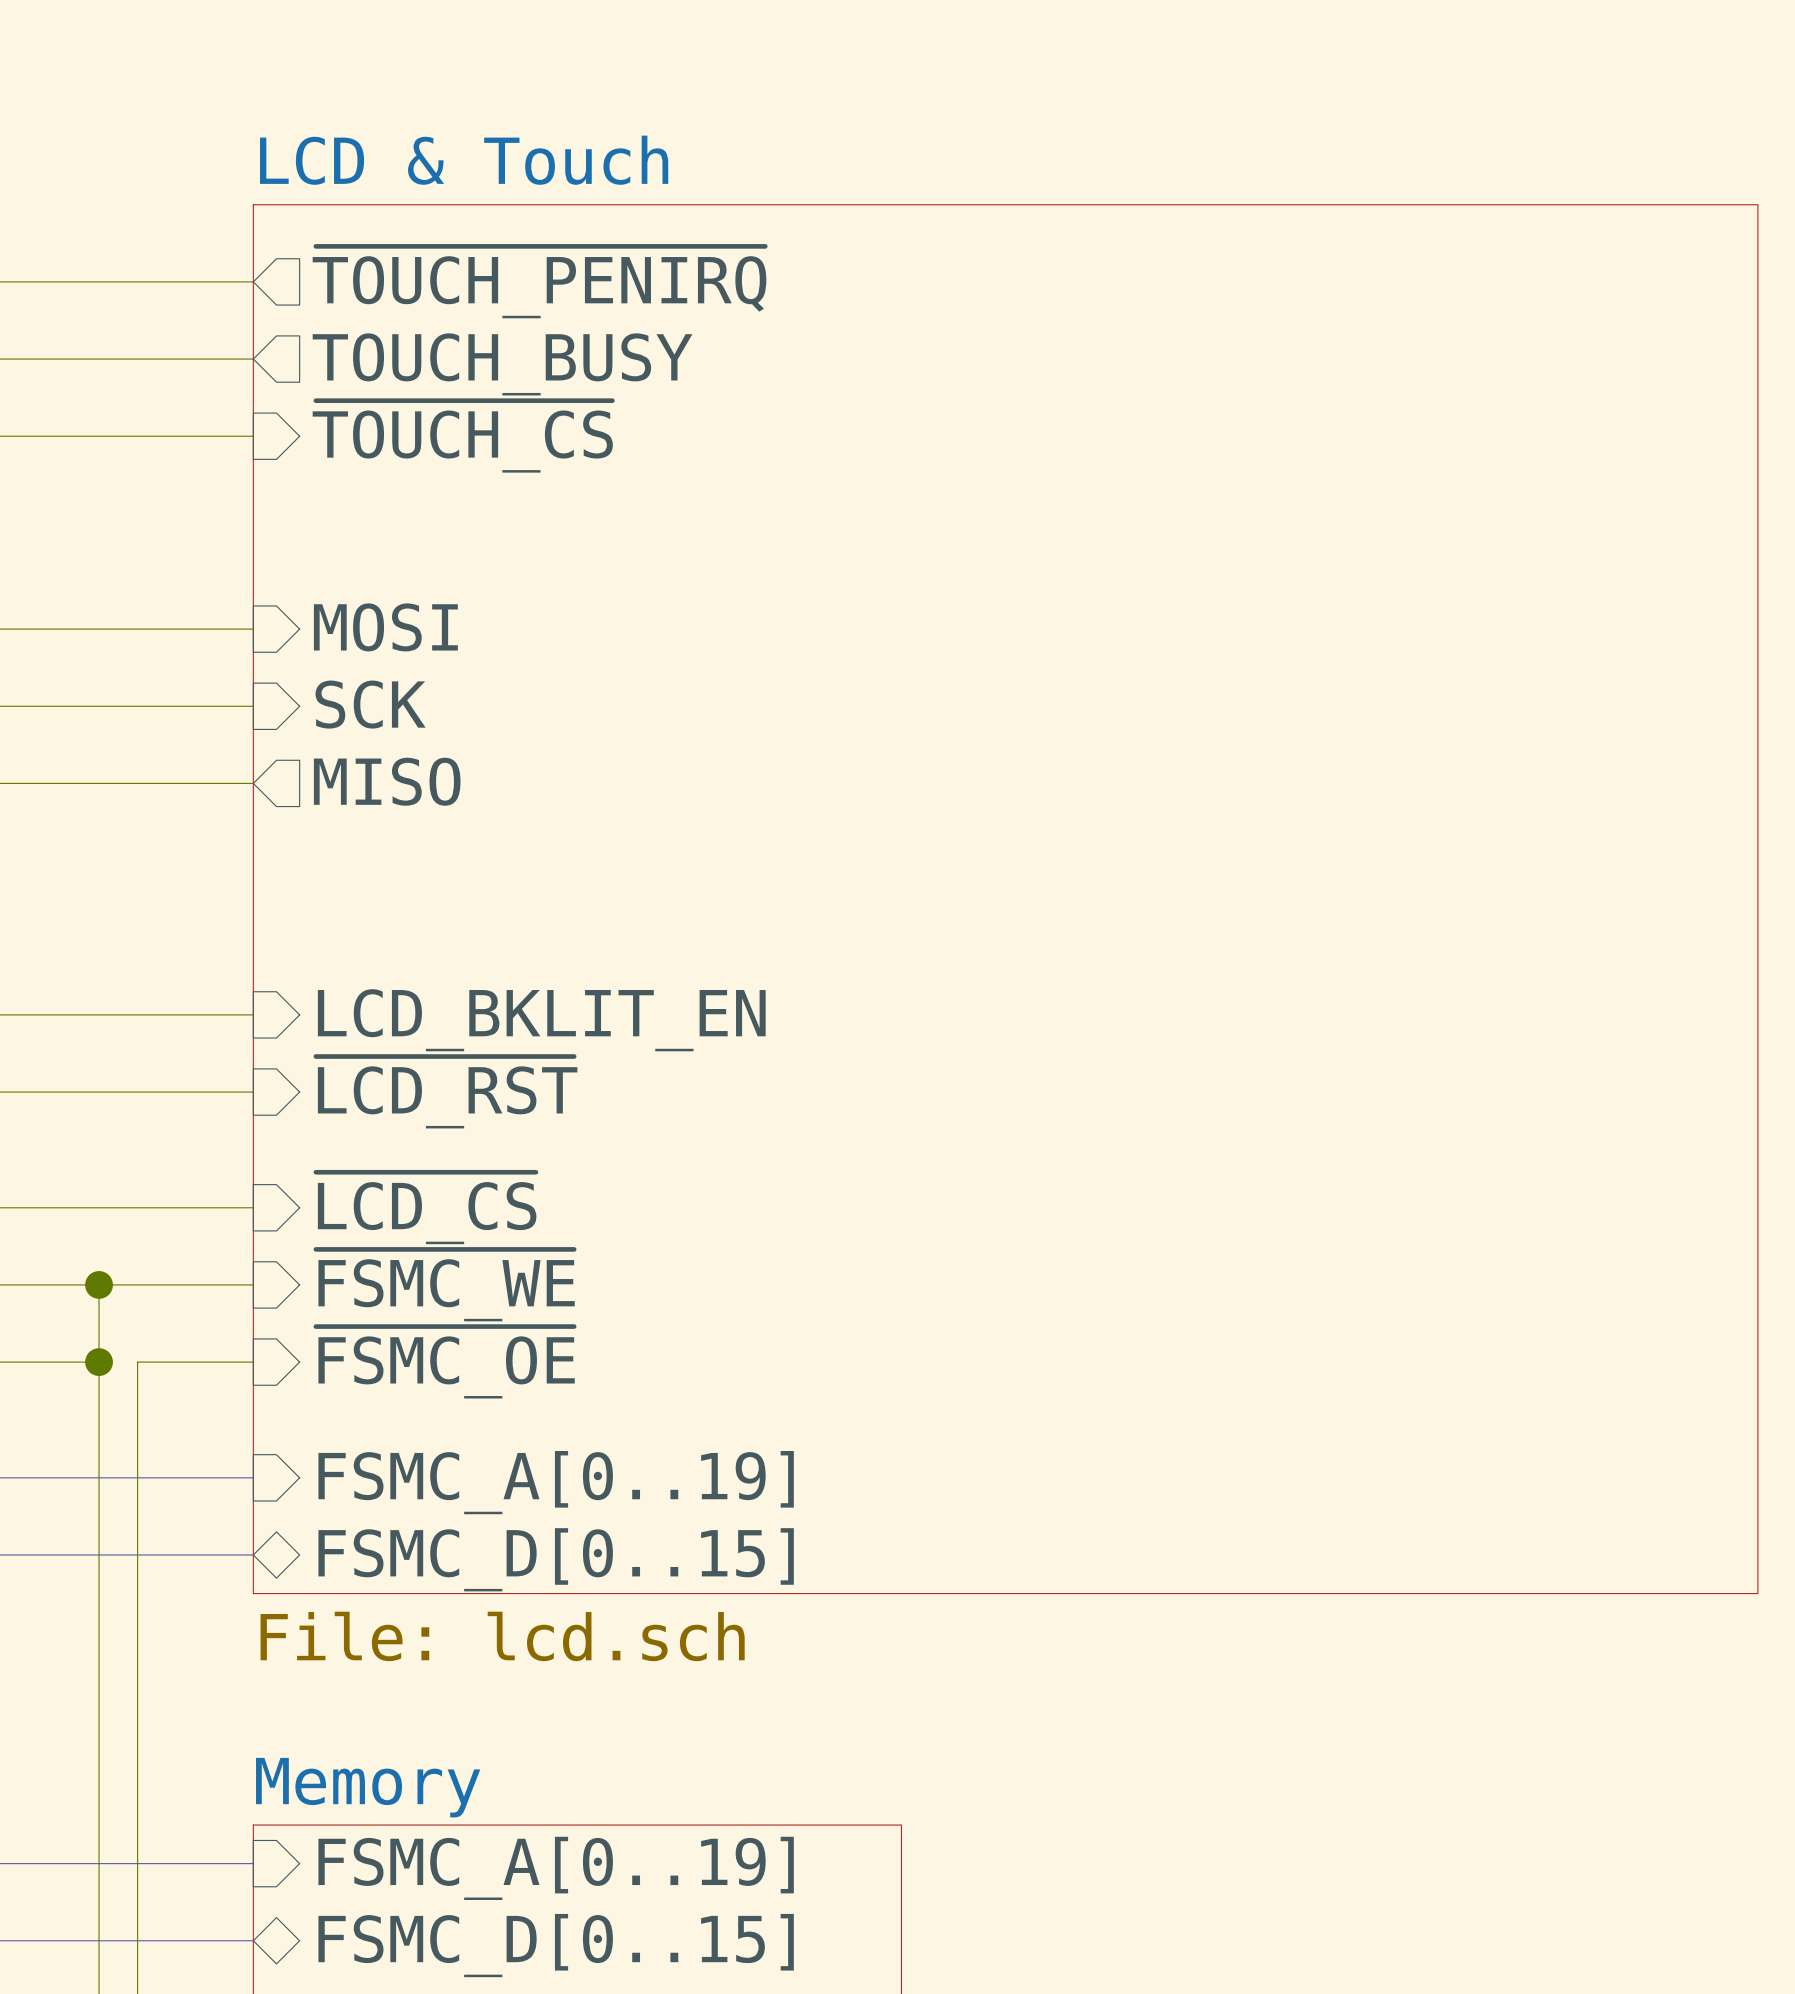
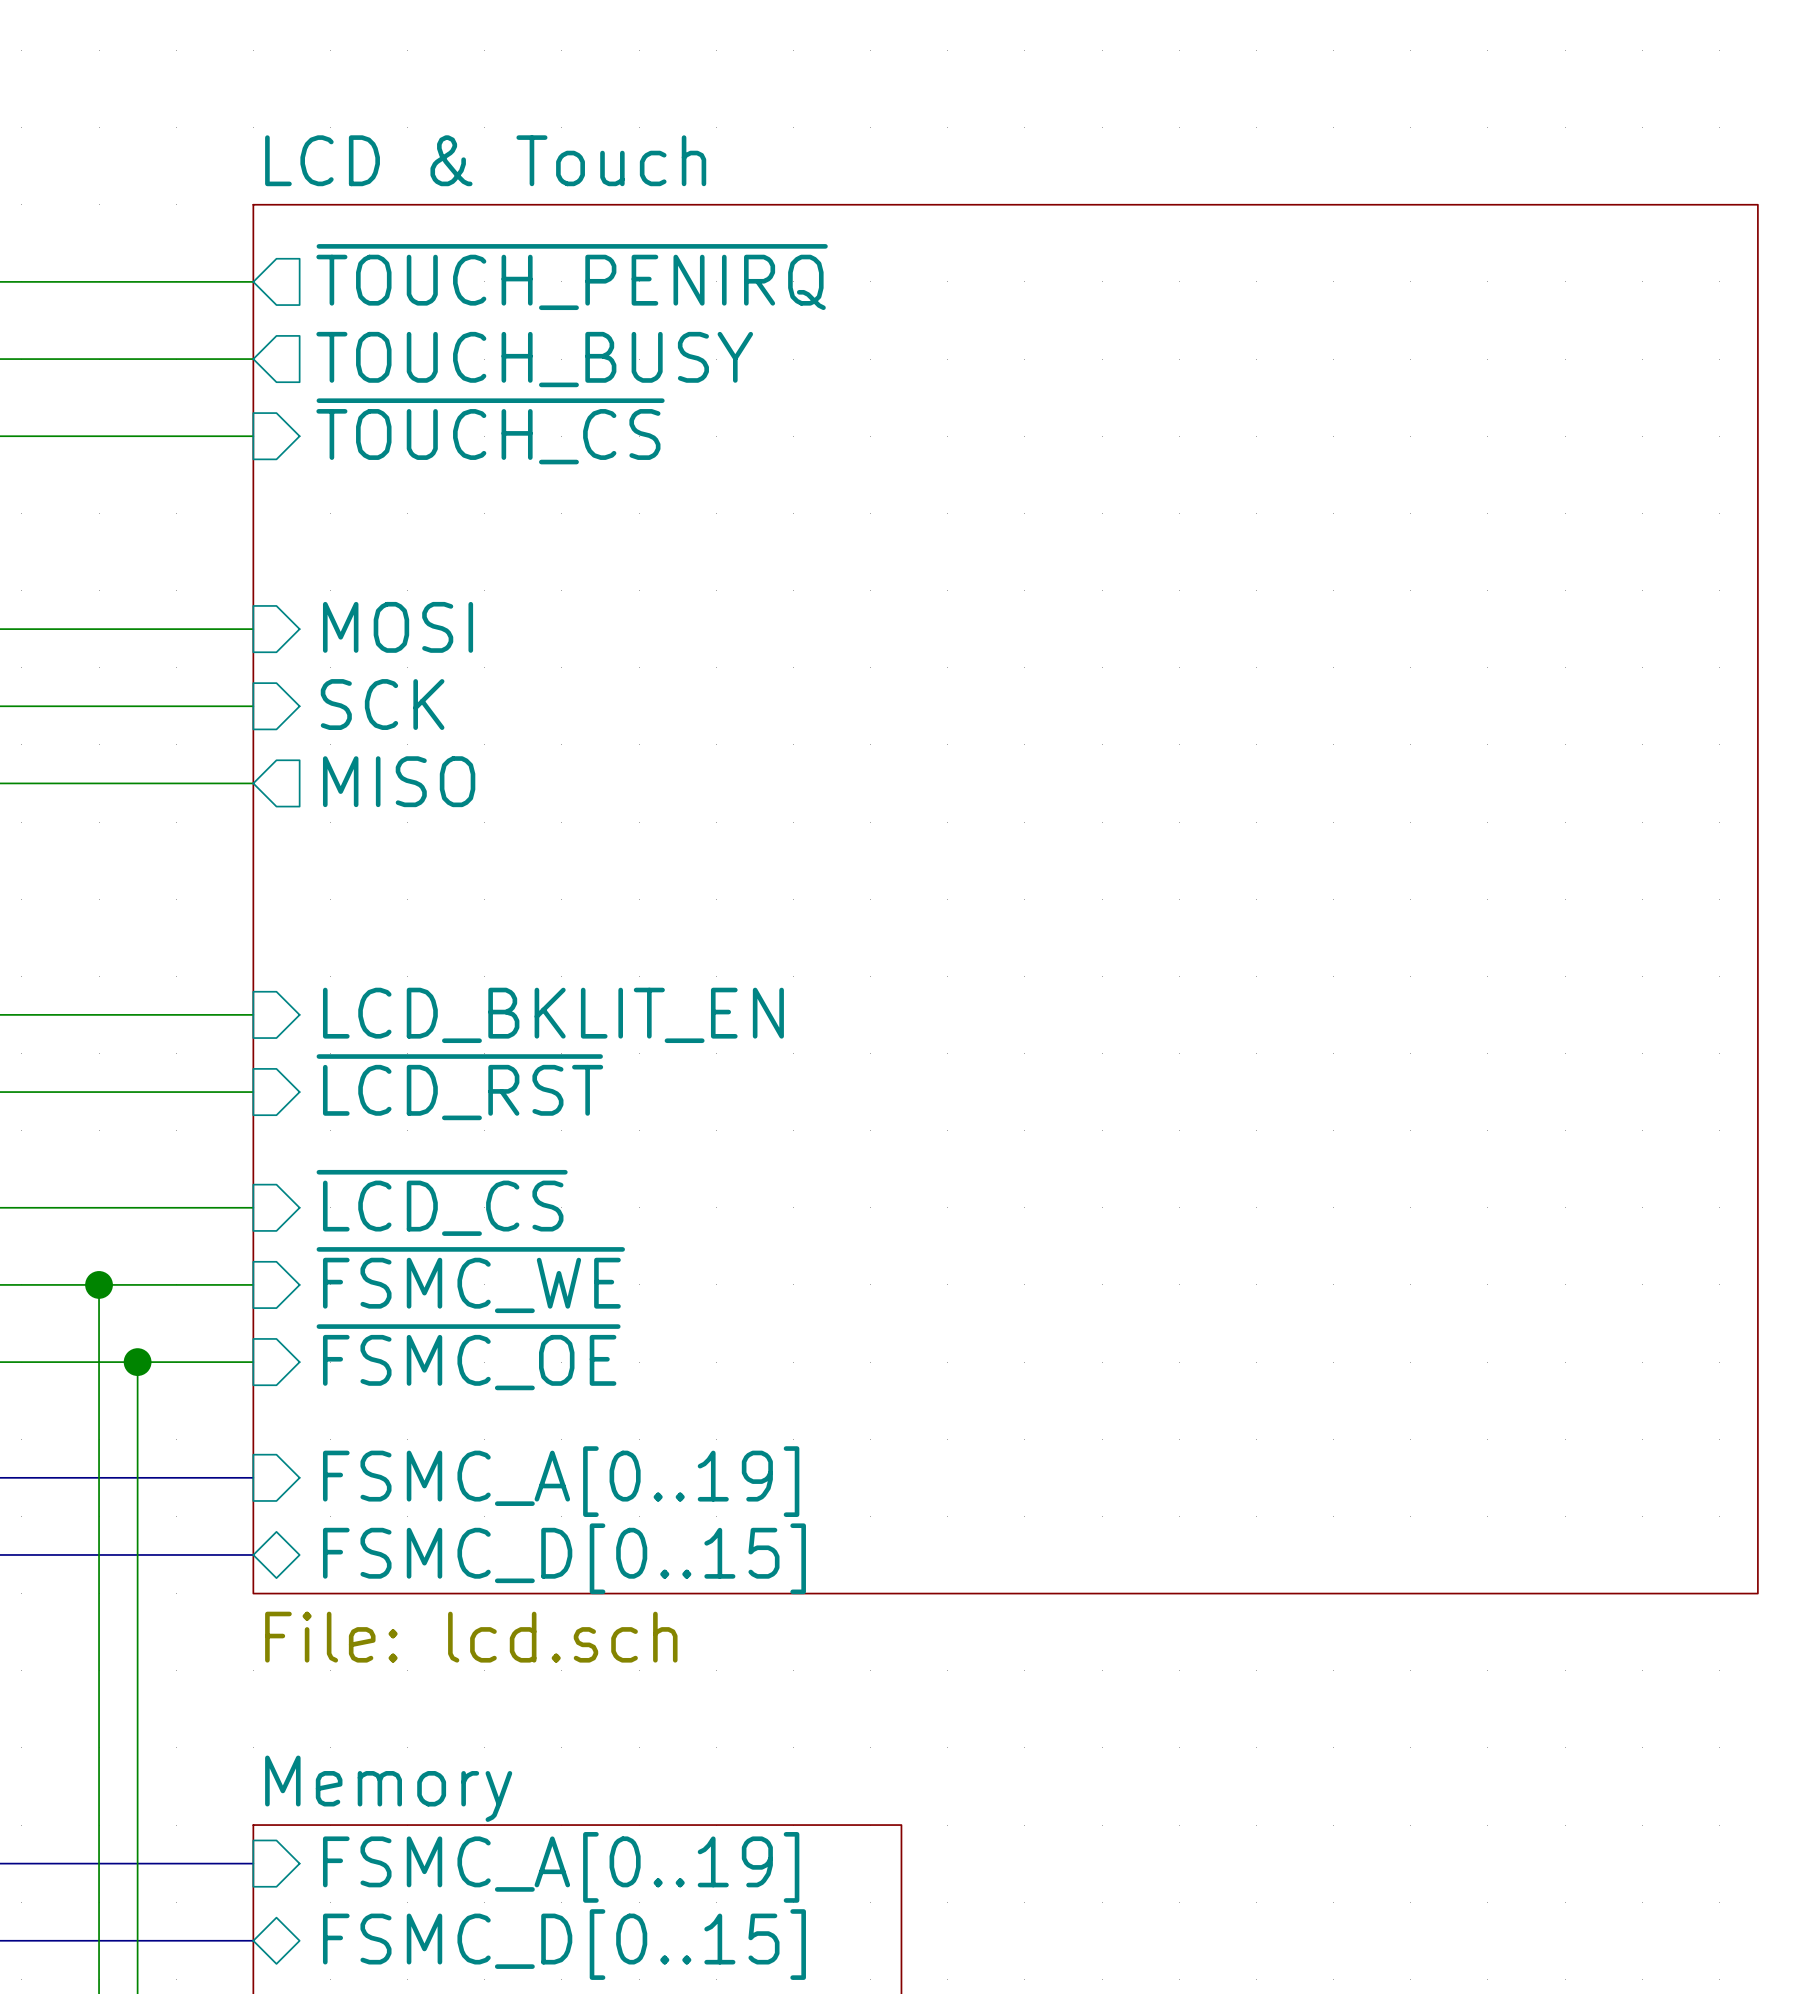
wire: none -> (99, 1362) (137, 1362)
junction position: (99, 1362) -> (137, 1362)

